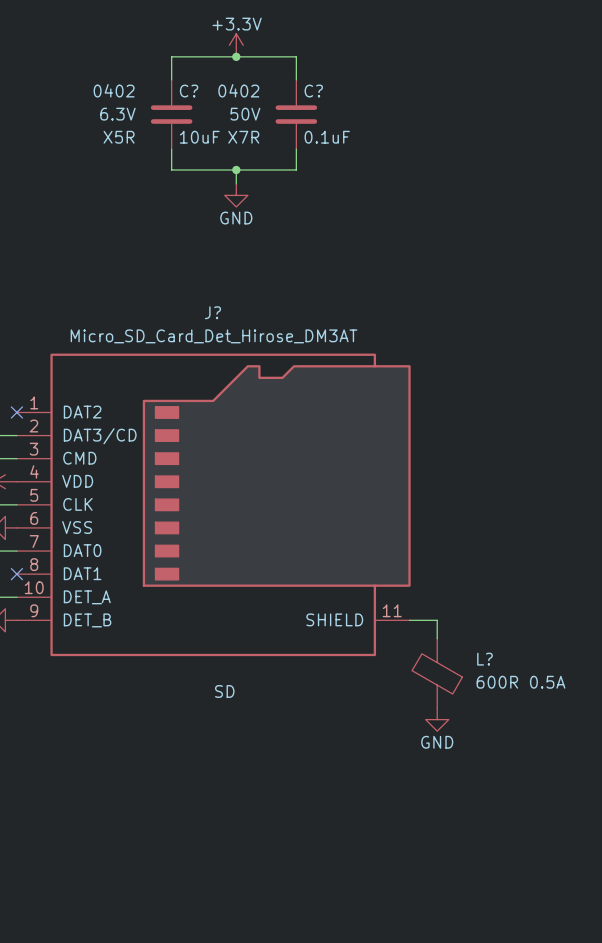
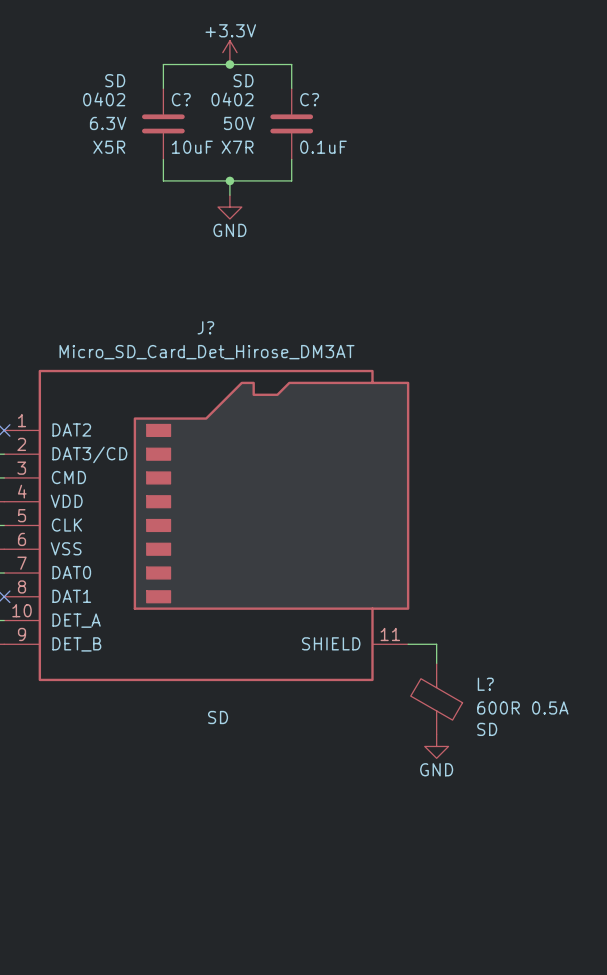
C? text: none -> SD (115, 80)
C? text: none -> SD (243, 80)
L? text: none -> SD (487, 729)

